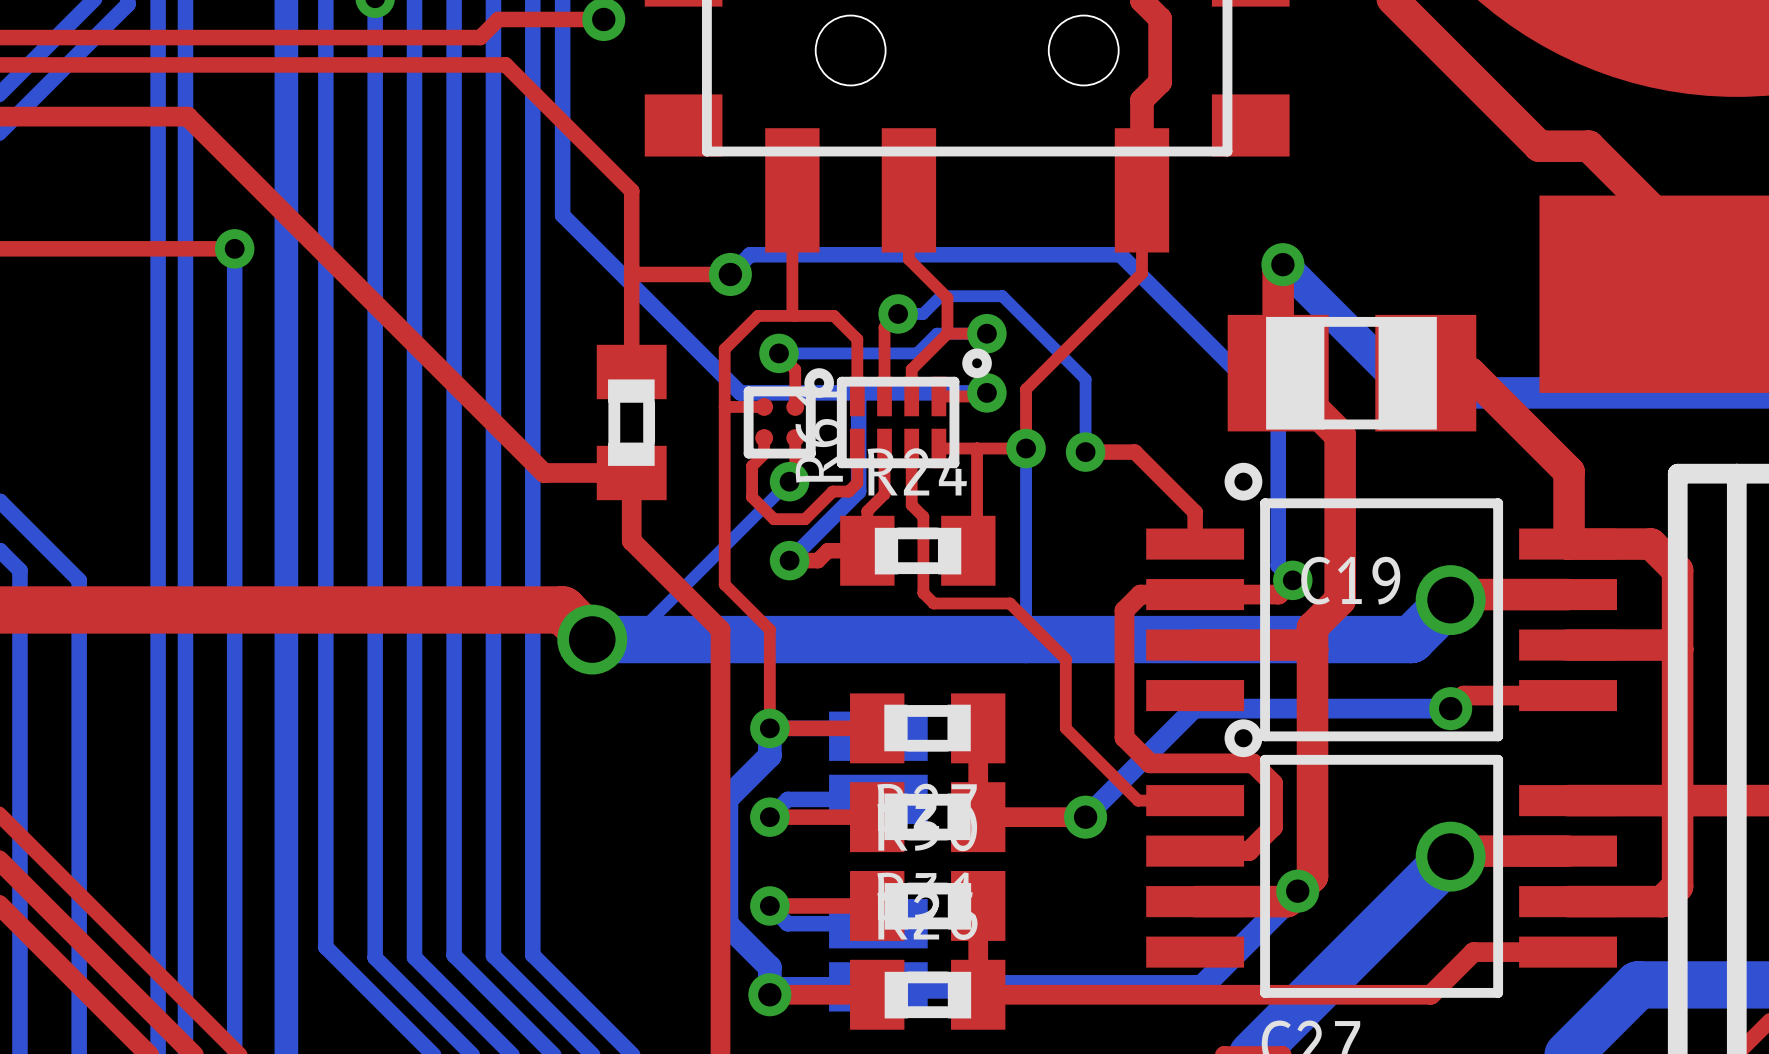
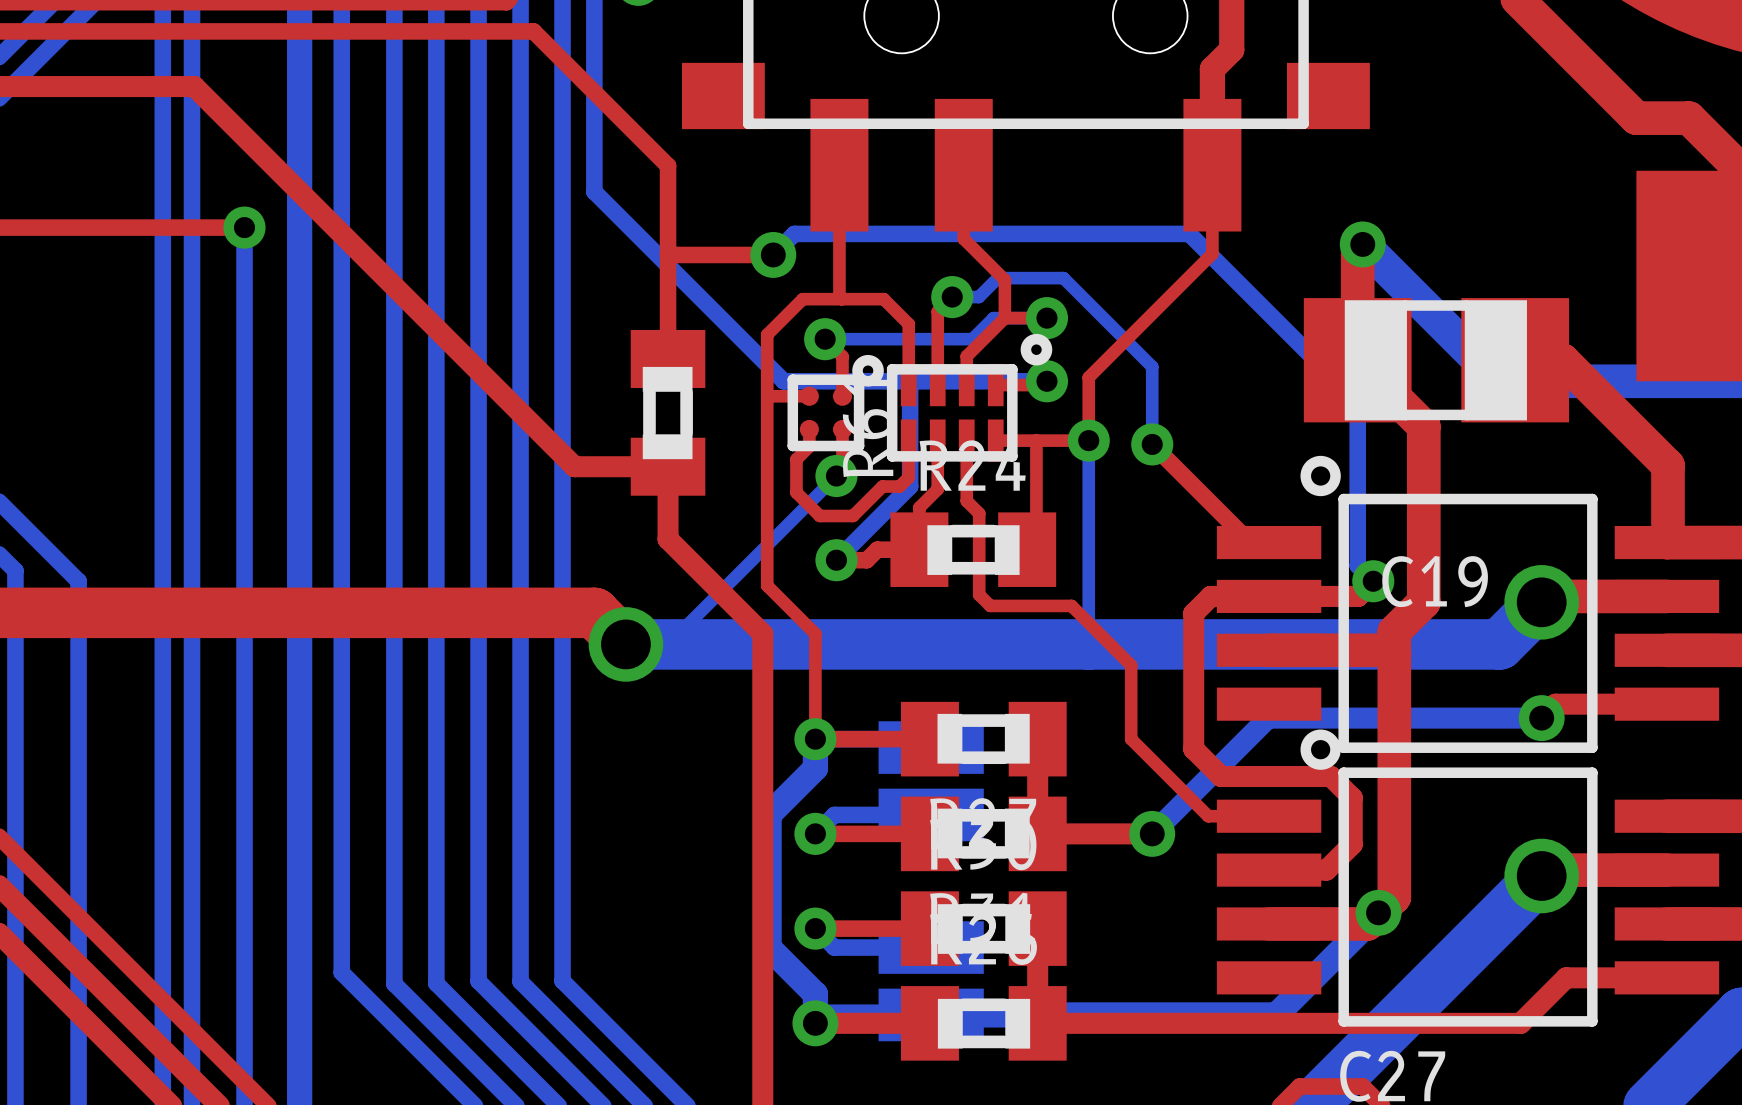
top track: (1085, 452) (1134, 452) (1195, 512) (1195, 544) -> (1152, 444) (1250, 542) (1269, 542)

